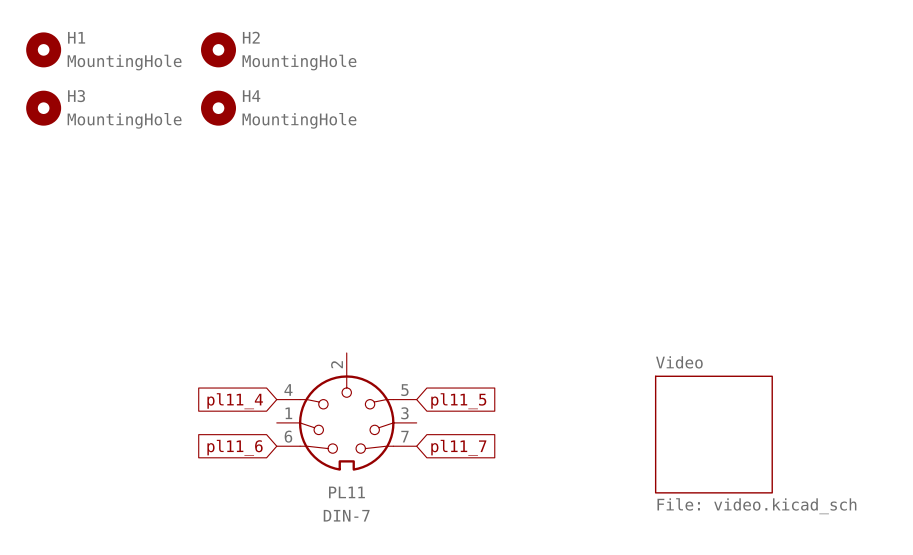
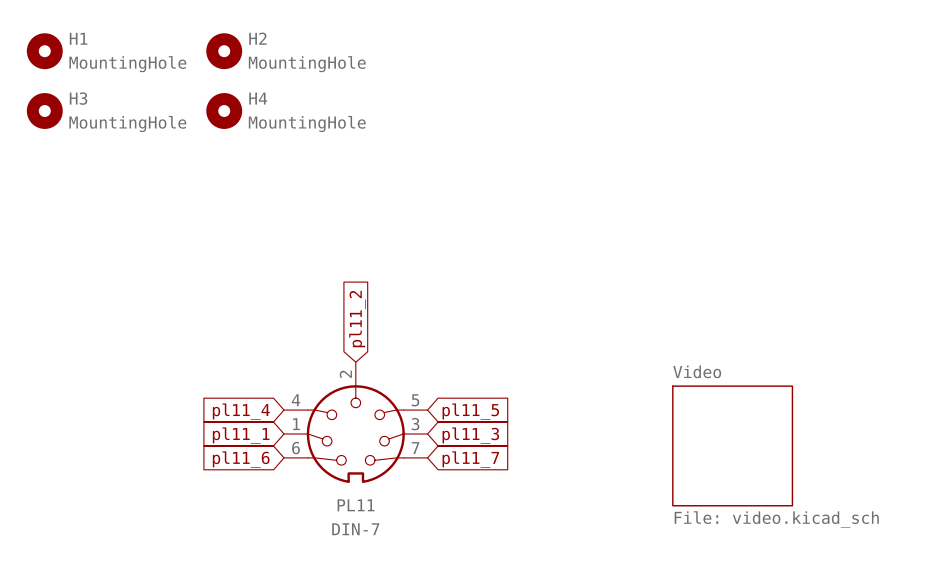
global label: none -> pl11_2 (357, 319)
global label: none -> pl11_1 (241, 435)
global label: none -> pl11_3 (470, 435)

